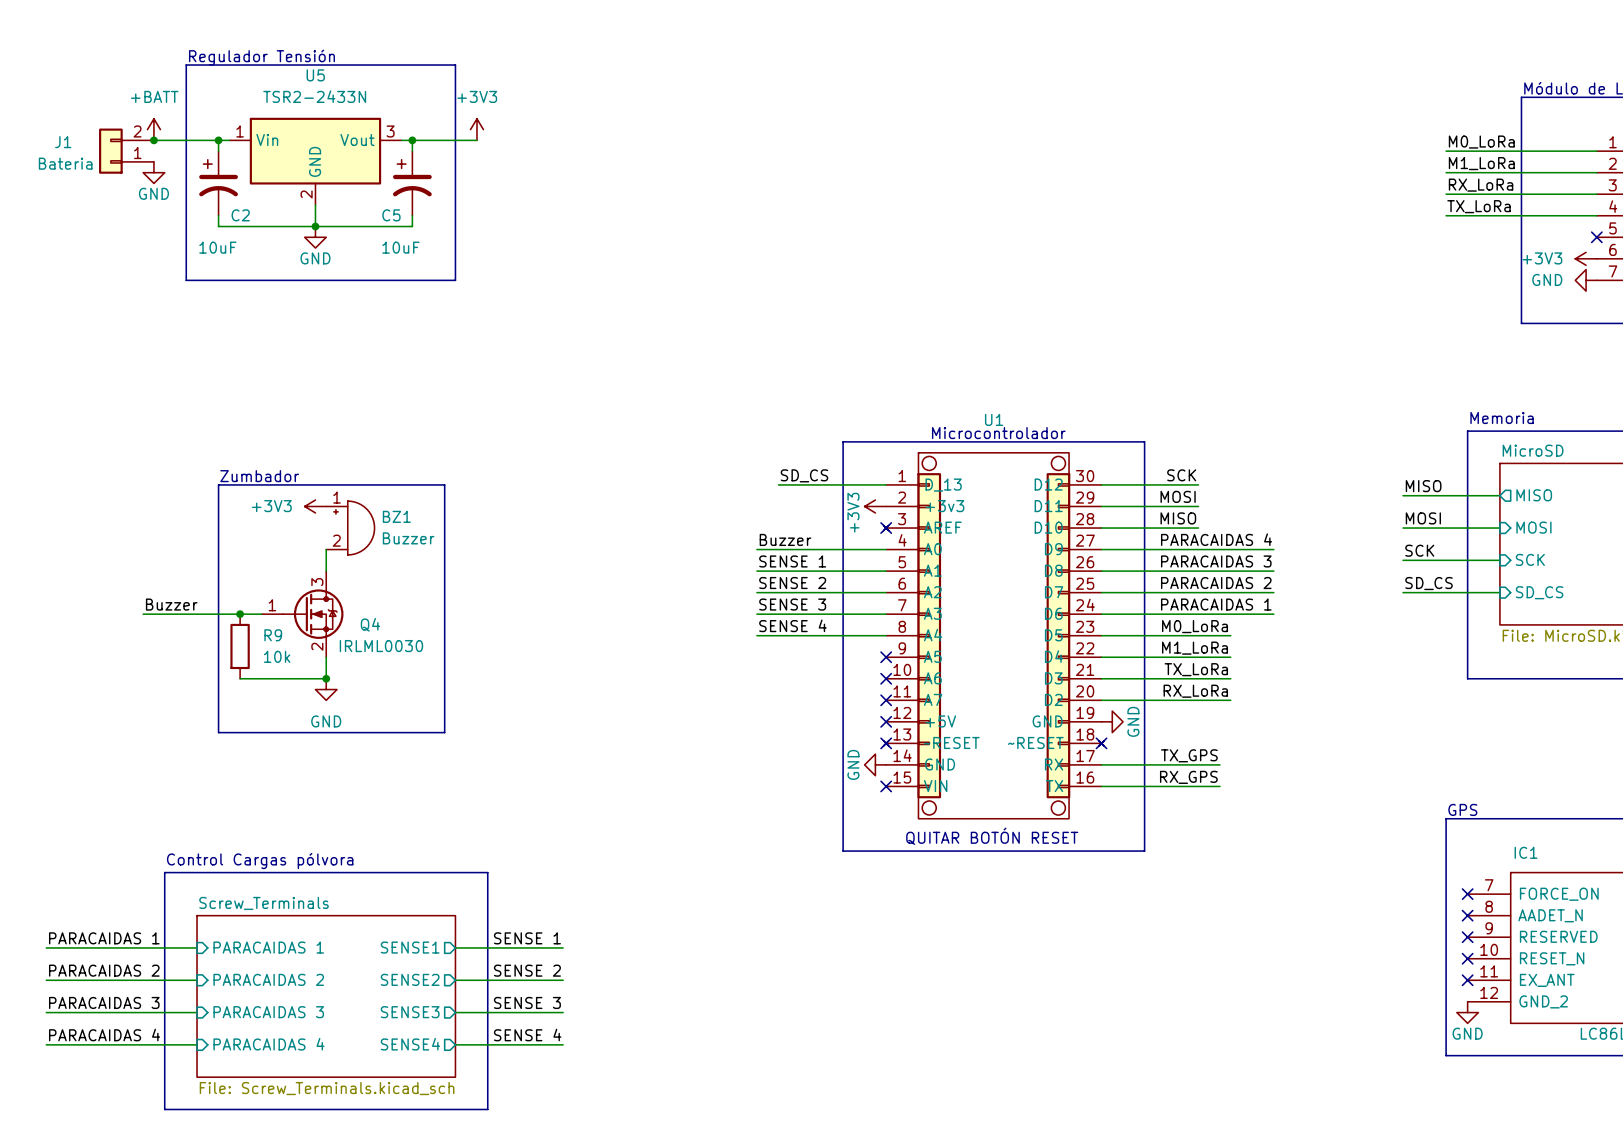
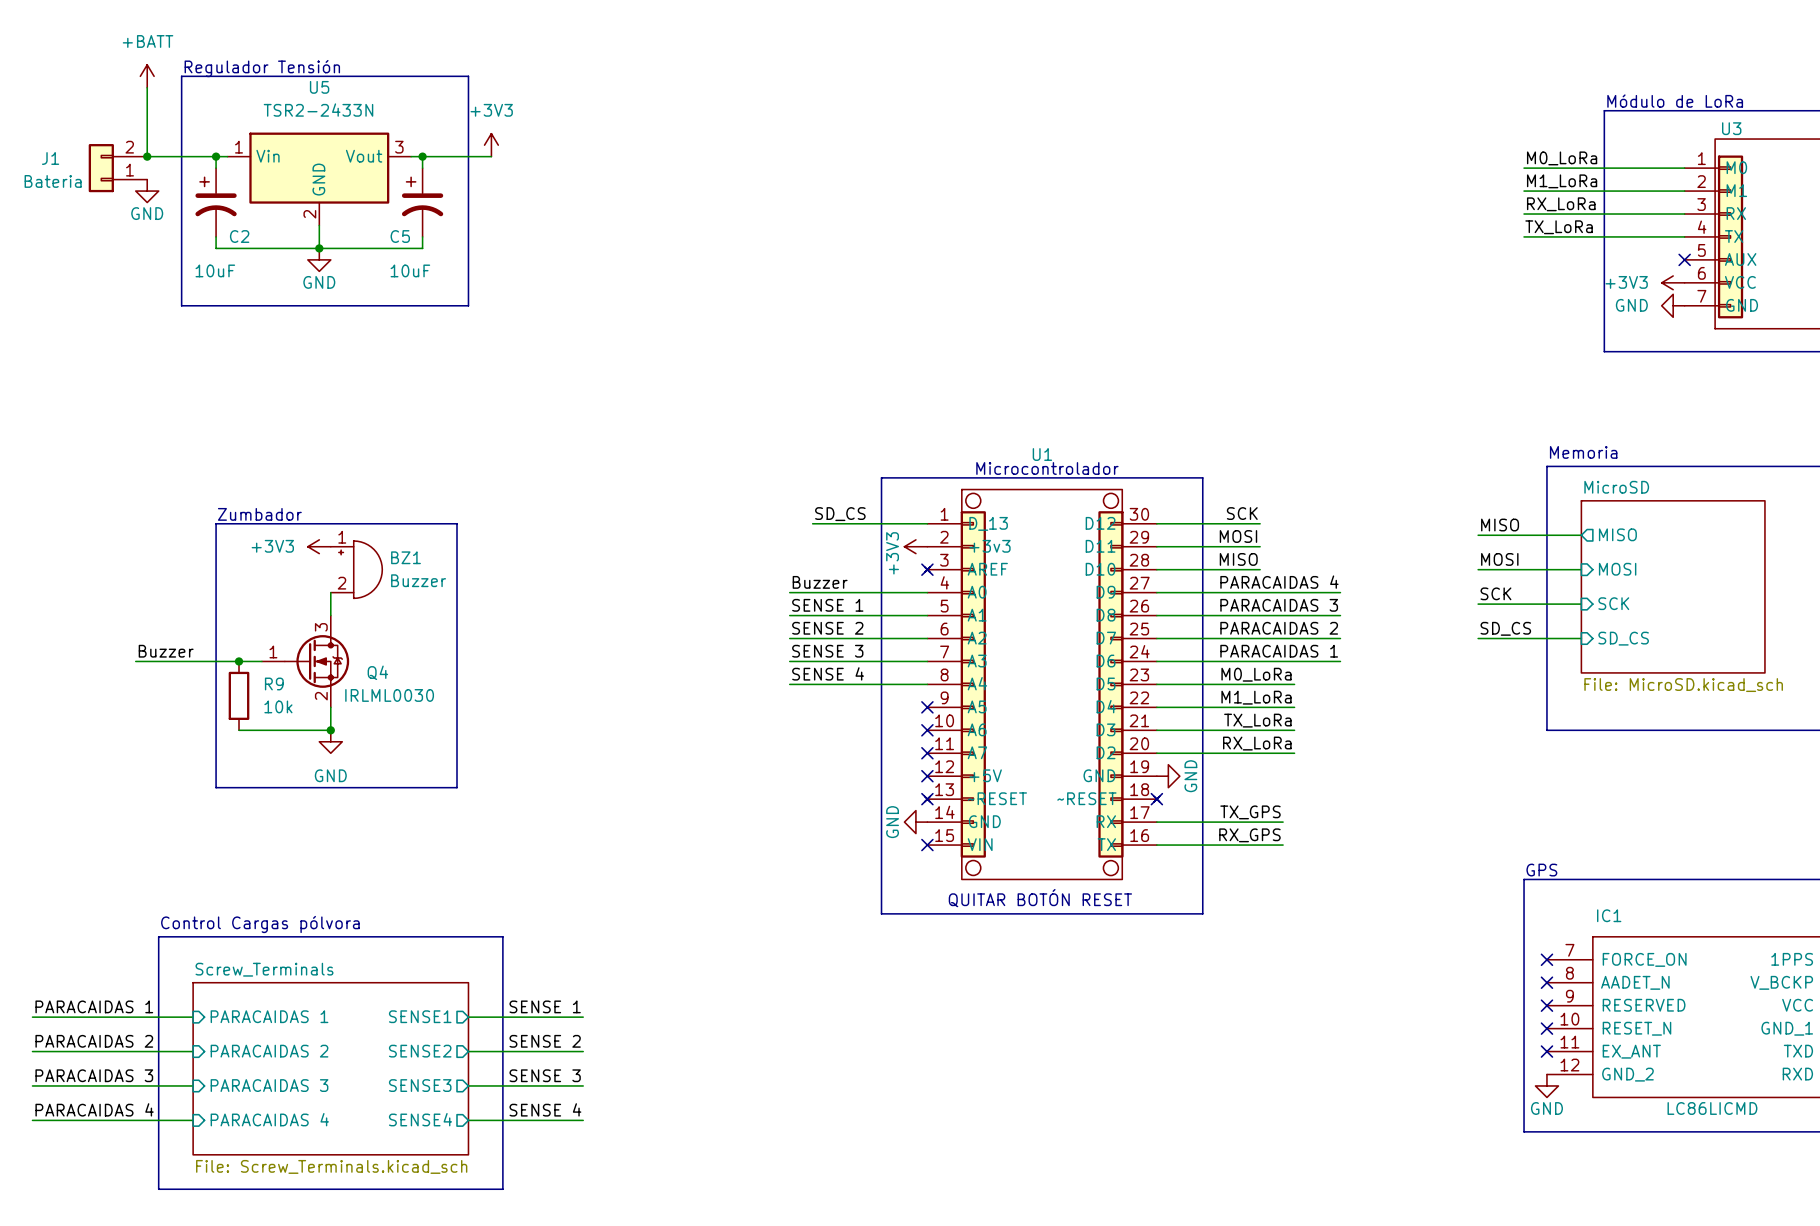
wire: none -> (147, 87) (147, 156)
power symbol position: +BATT (153, 129) -> +BATT (147, 76)

